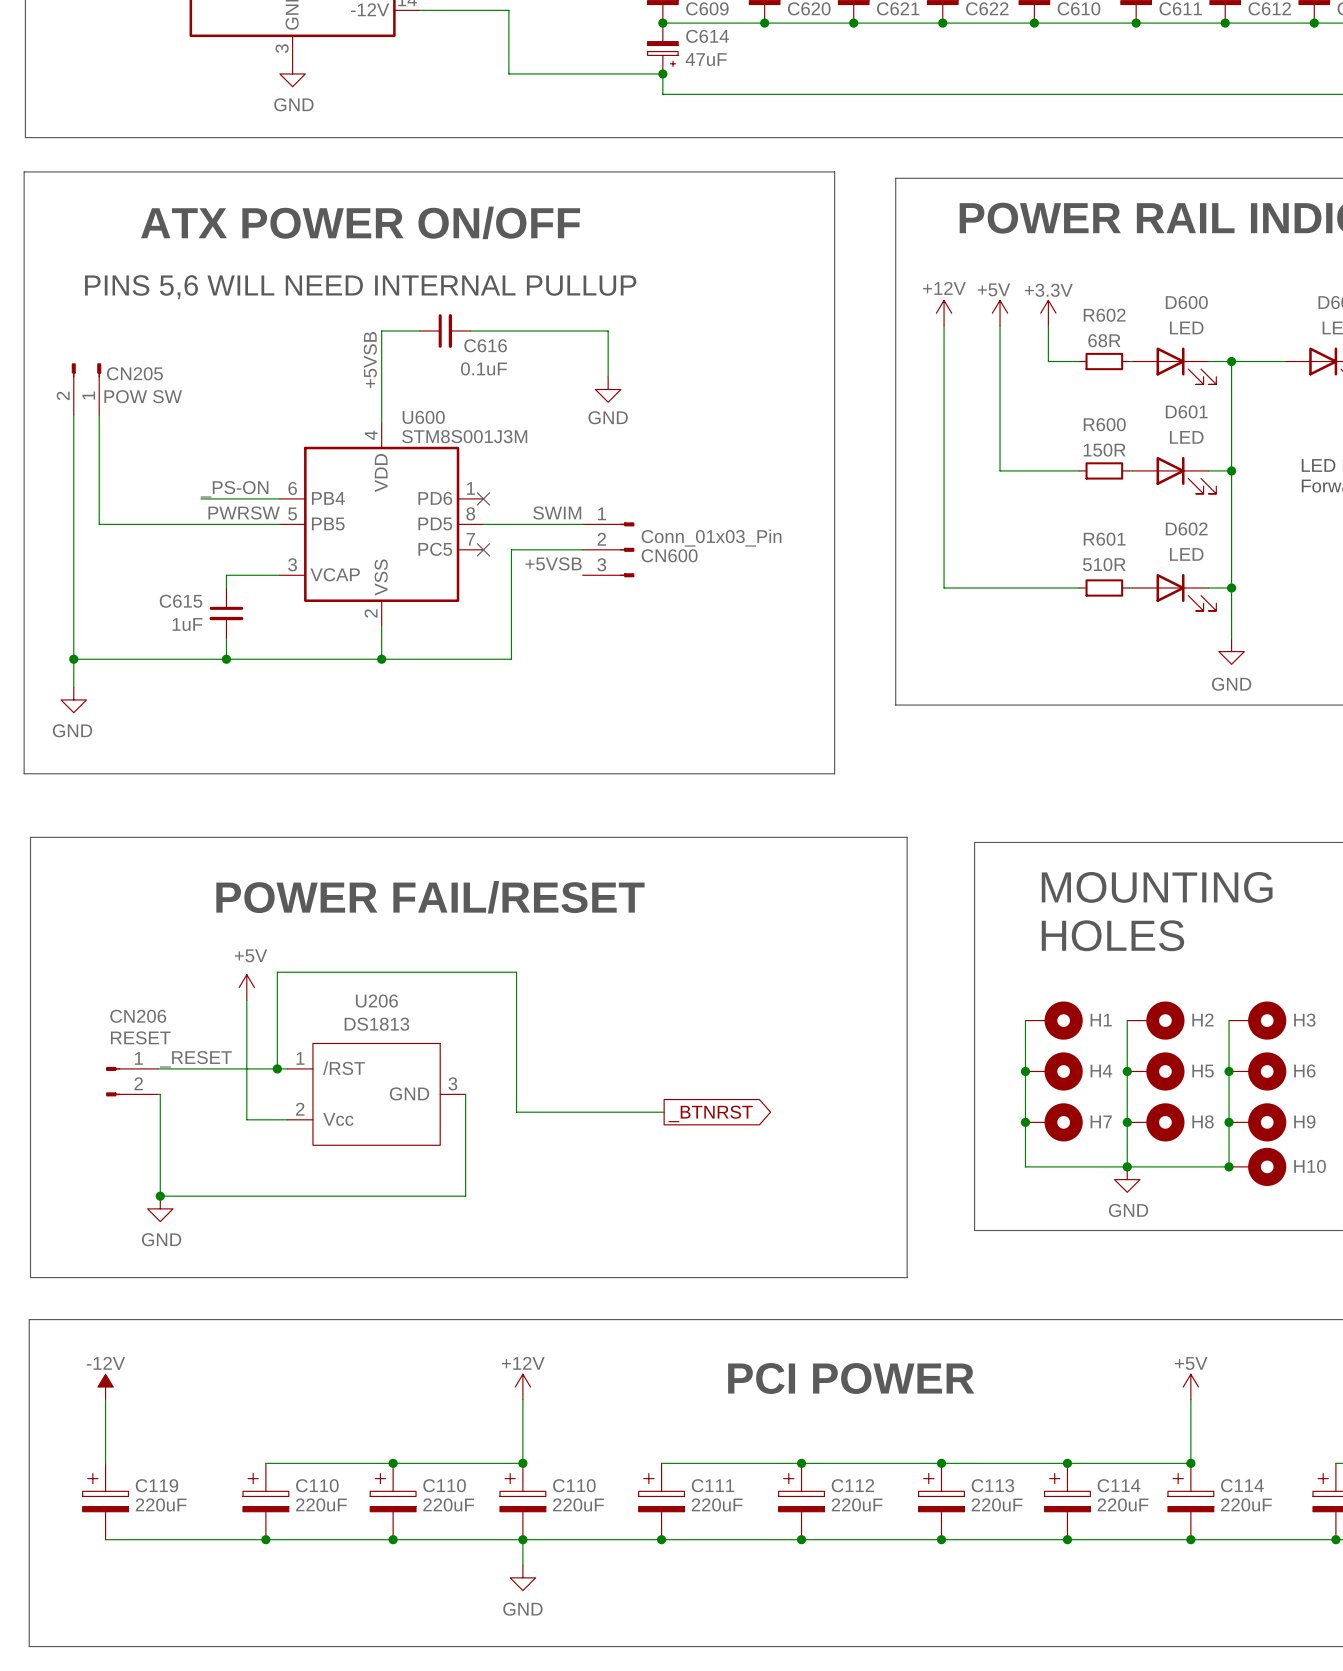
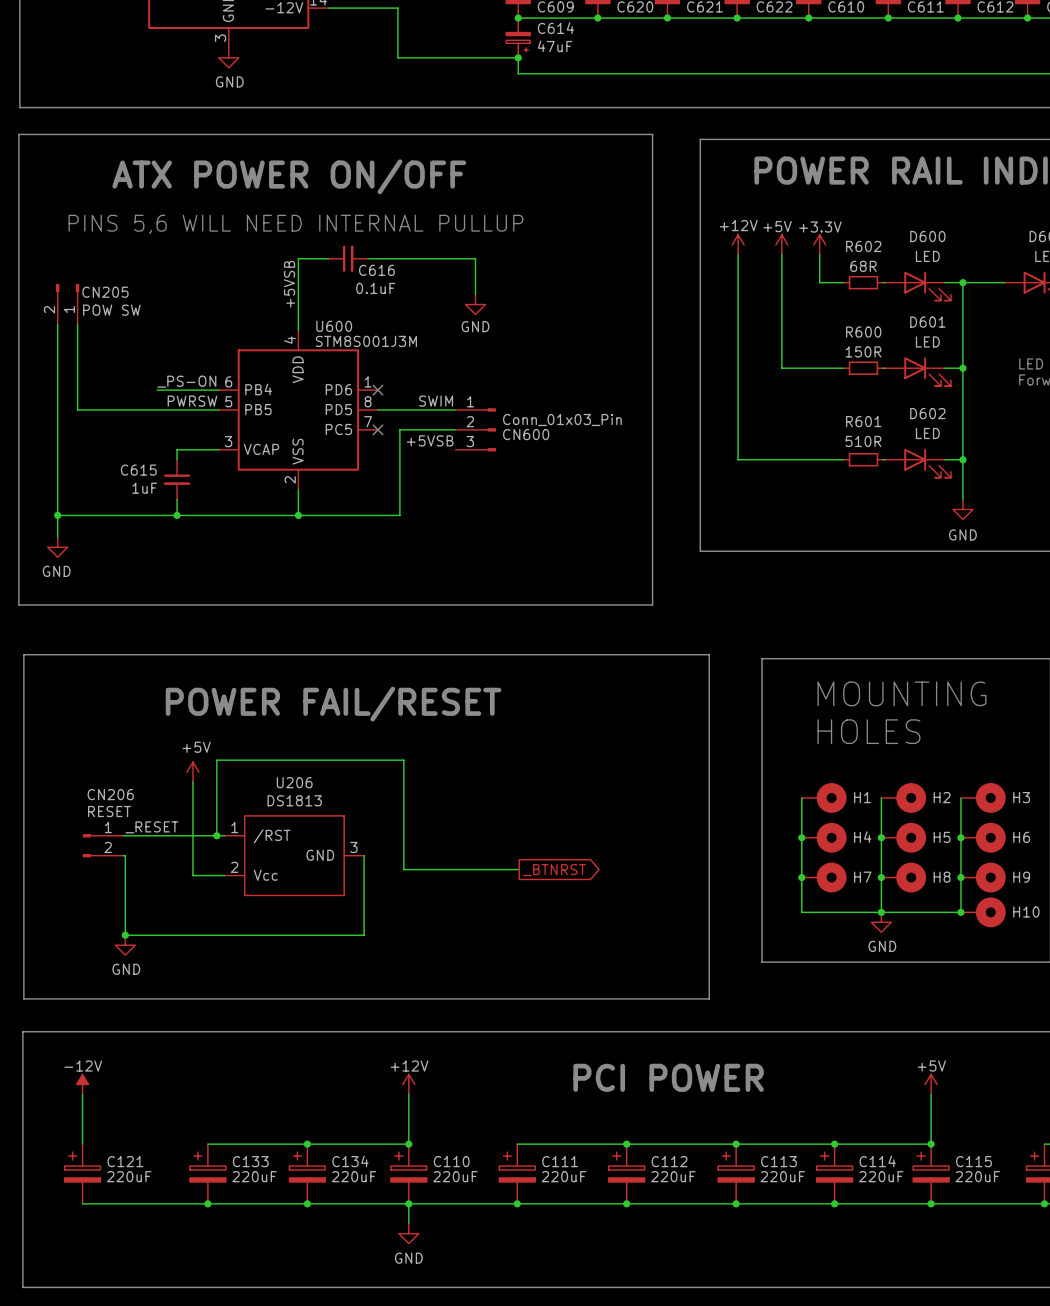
C119 name: C119 (156, 1485) -> C121 (125, 1161)
C110 name: C110 (317, 1485) -> C133 (250, 1161)
C110 name: C110 (444, 1485) -> C134 (350, 1161)
C114 name: C114 (1242, 1485) -> C115 (973, 1161)

